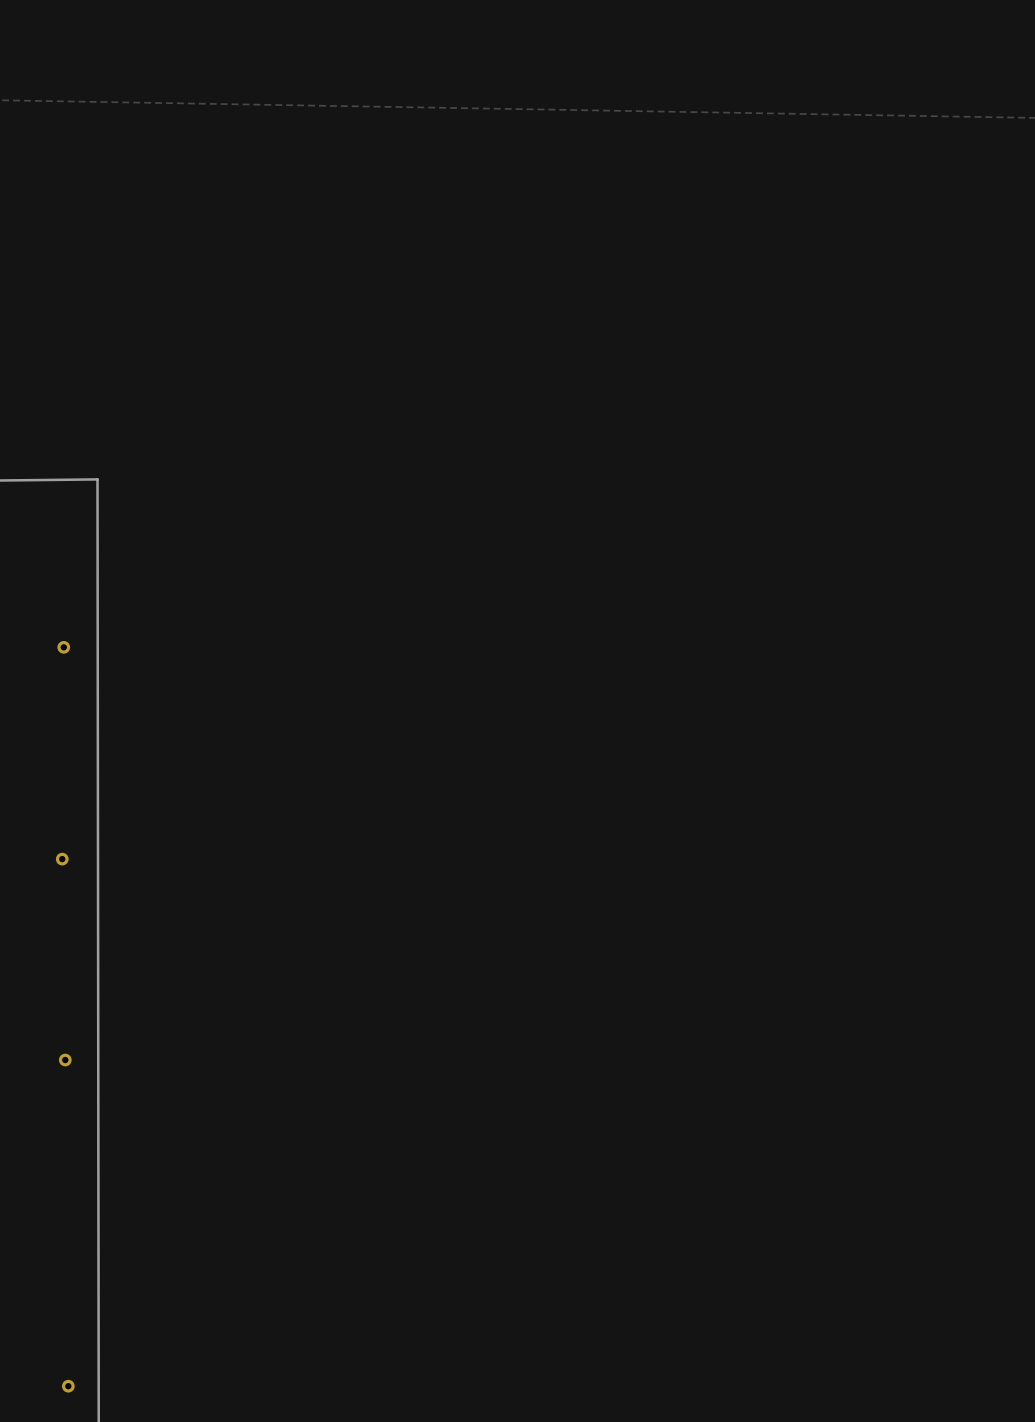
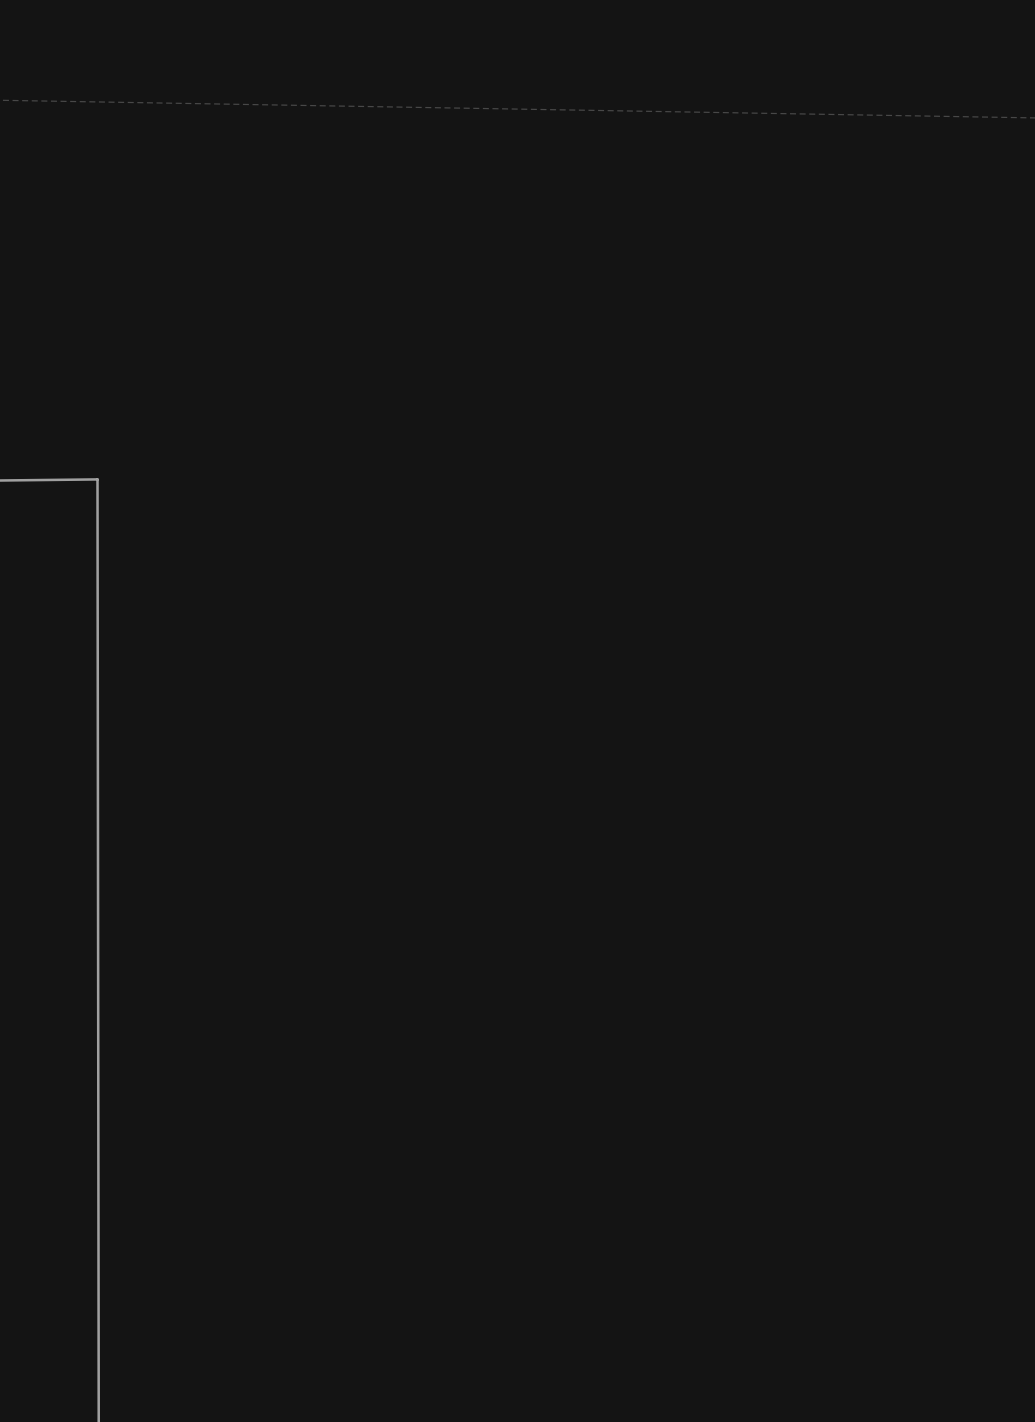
via: (63, 647) -> none
via: (62, 859) -> none
via: (65, 1060) -> none
via: (68, 1386) -> none

